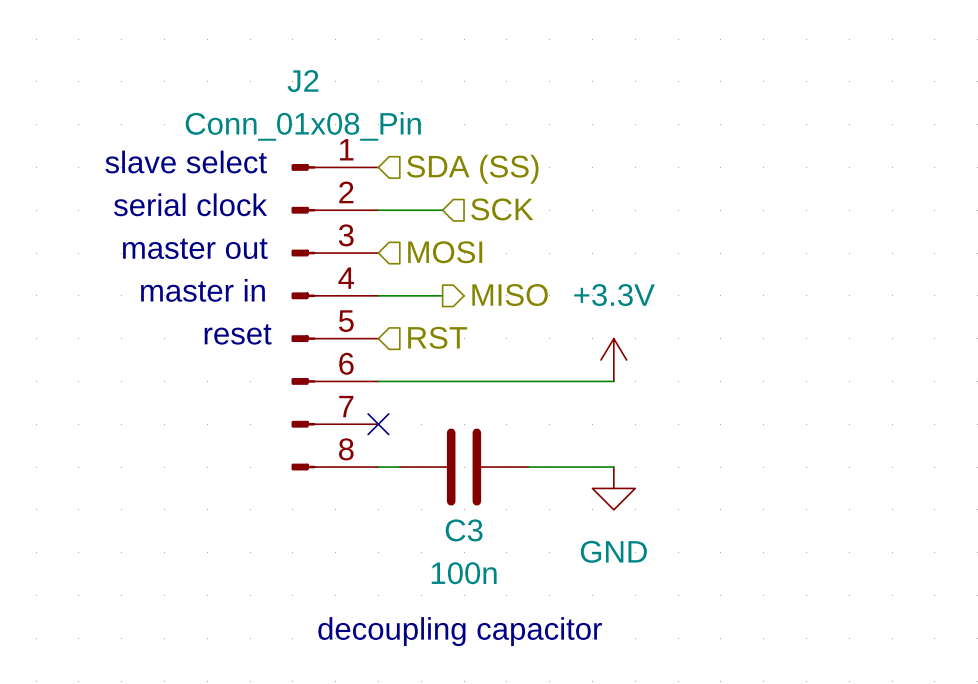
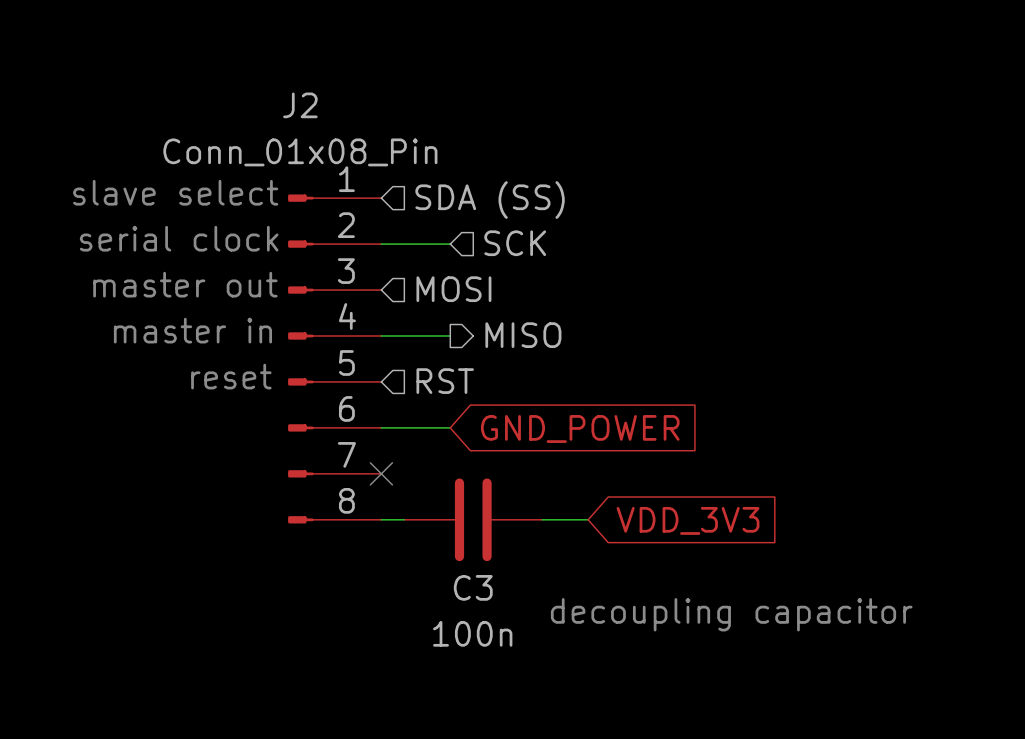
power symbol: +3.3V (613, 360) -> none
wire: (442, 381) (613, 381) -> none
global label: none -> GND_POWER (580, 428)
wire: (571, 467) (613, 467) -> none
global label: none -> VDD_3V3 (688, 520)
power symbol: GND (613, 488) -> none
text position: decoupling capacitor (460, 631) -> decoupling capacitor (731, 614)

